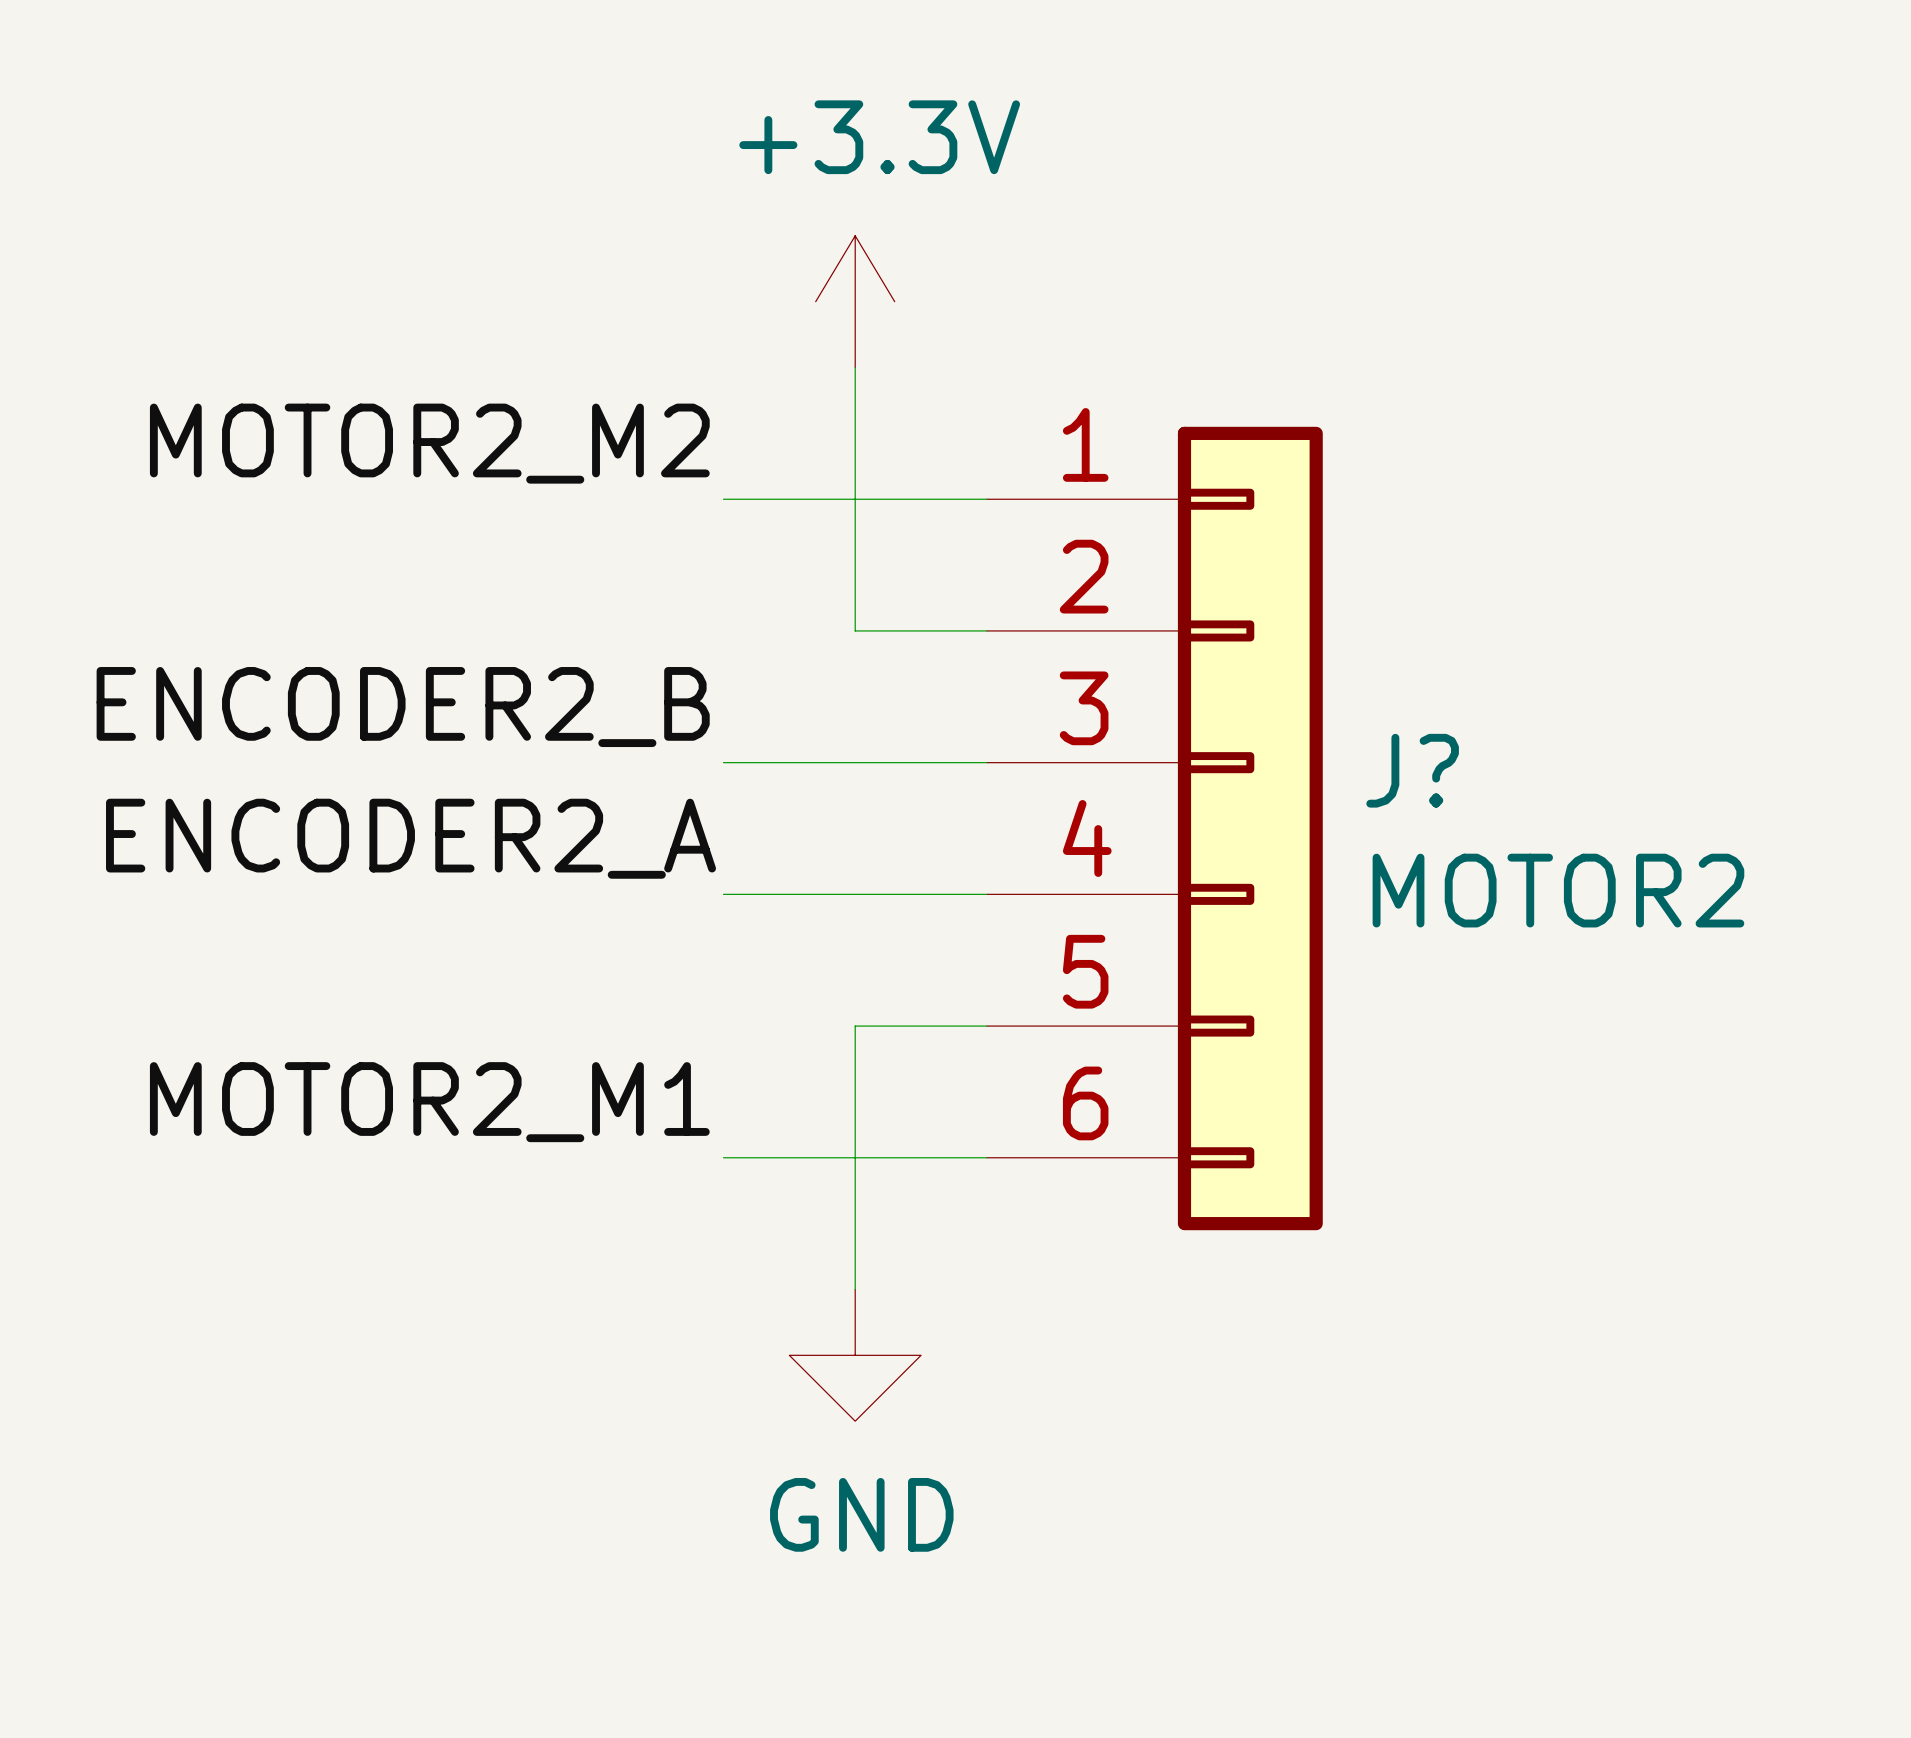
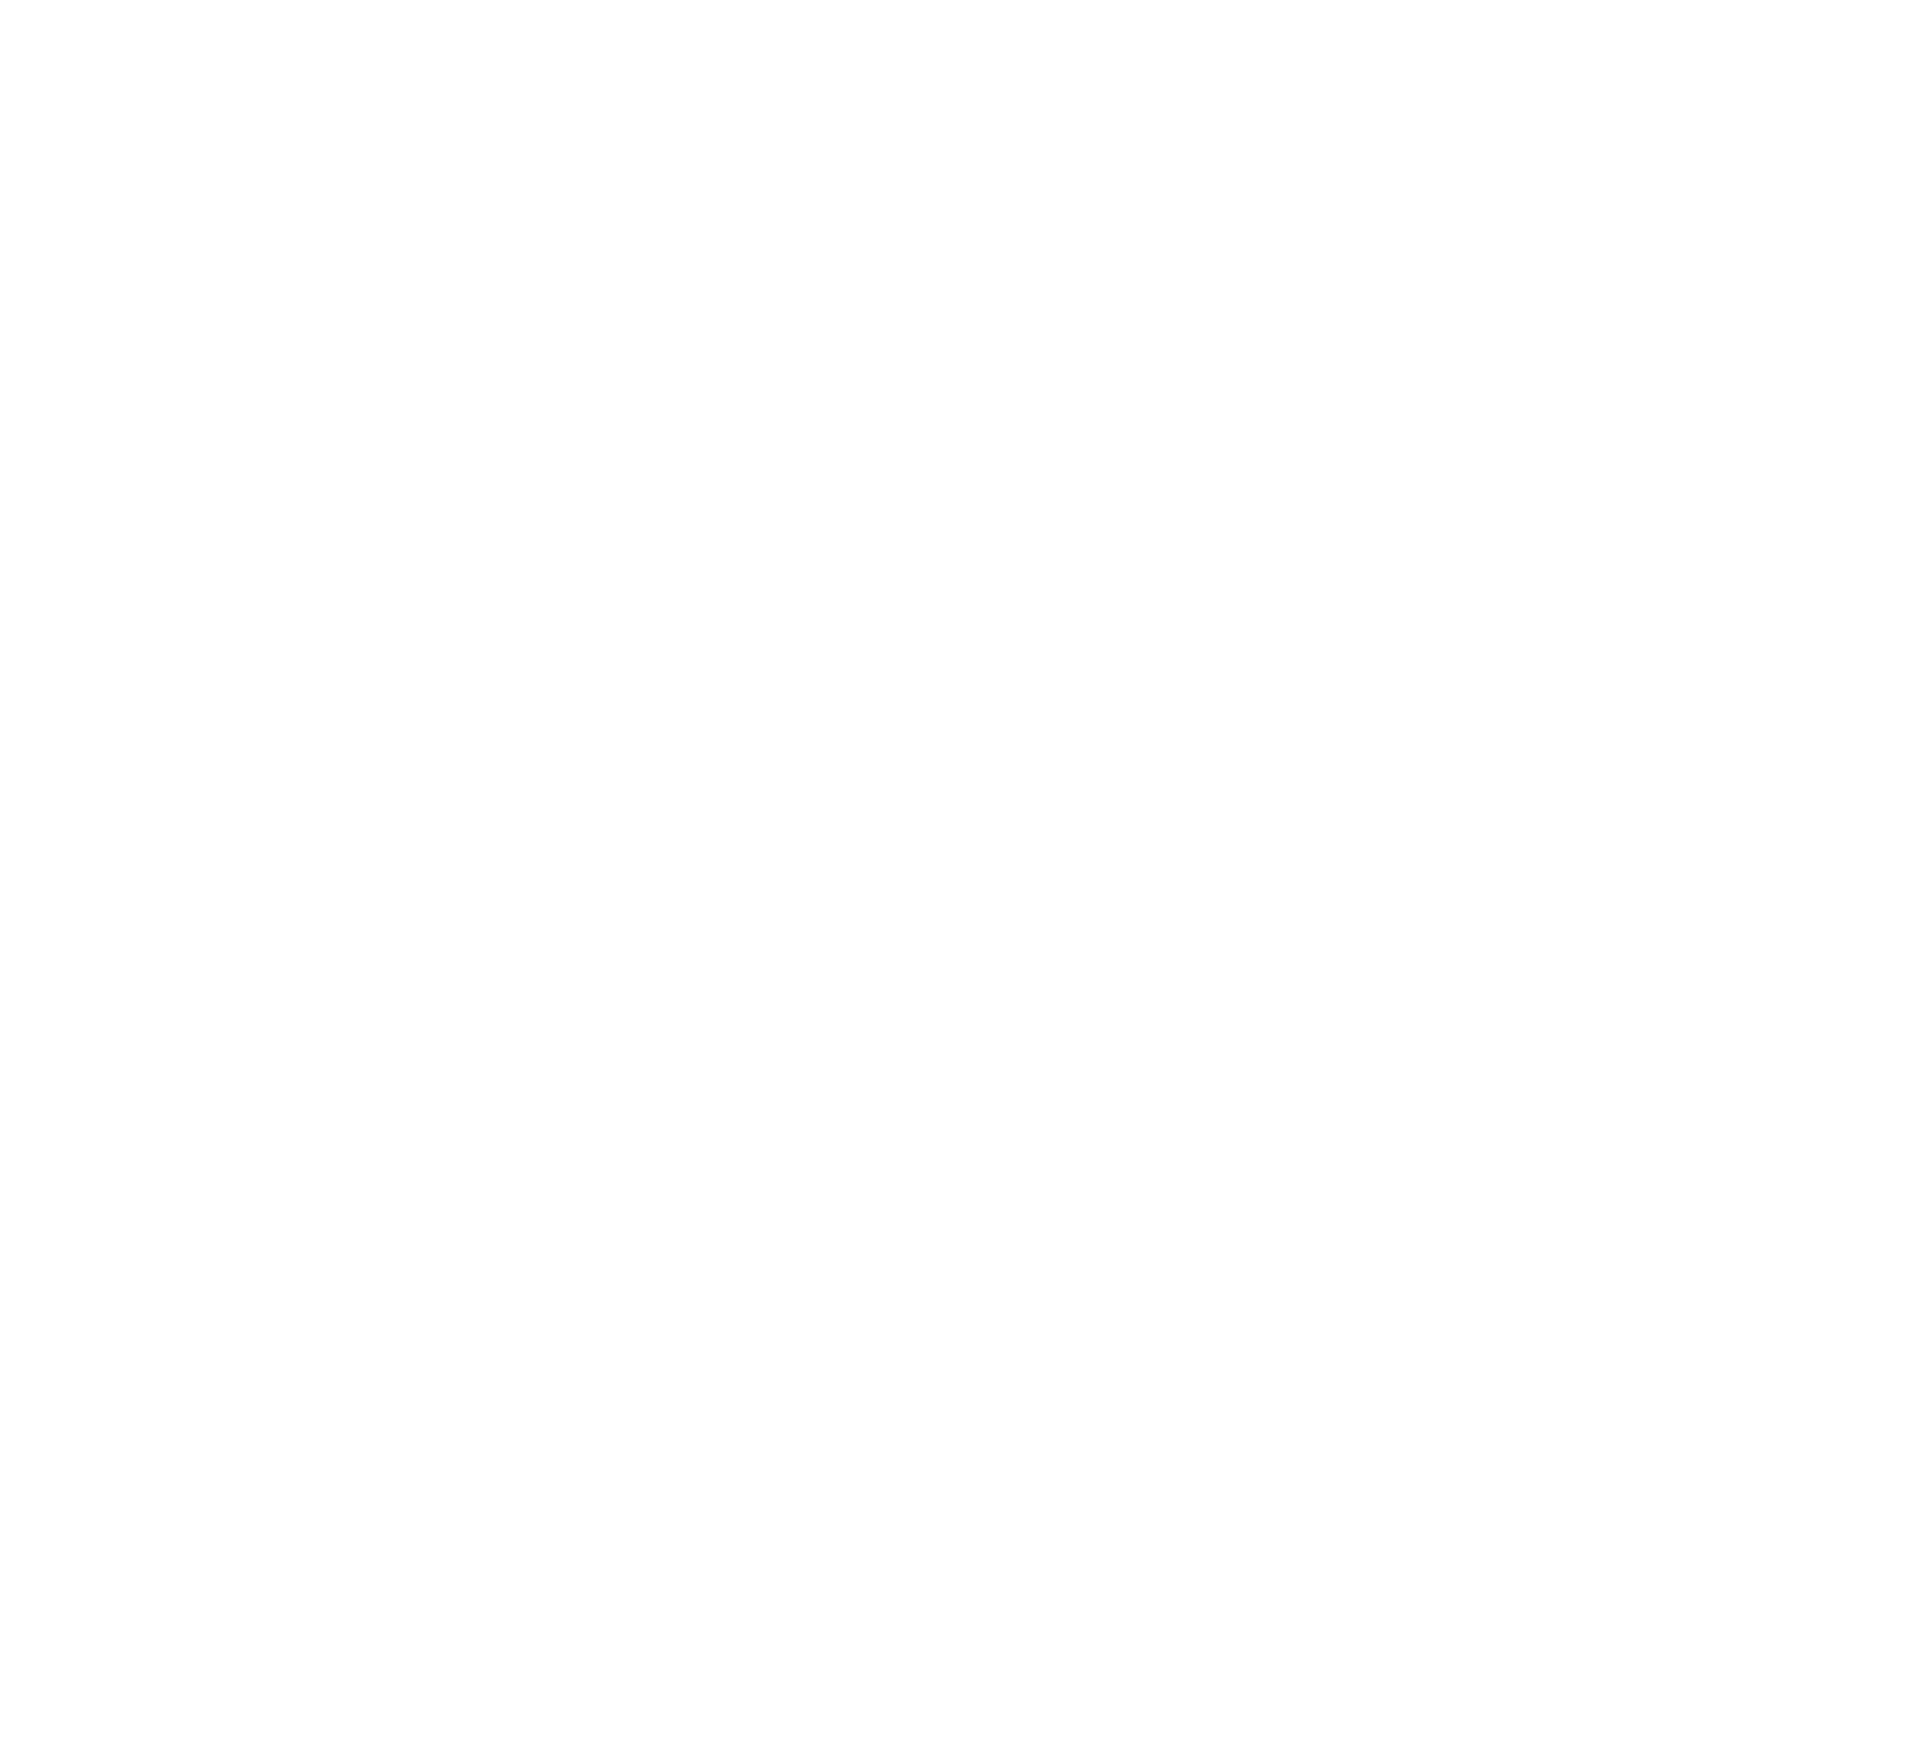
power symbol: +3.3V (855, 301) -> none
wire: (855, 367) (855, 630) (986, 630) -> none
label: MOTOR2_M2 (429, 443) -> none
wire: (723, 499) (986, 499) -> none
label: ENCODER2_B (403, 707) -> none
wire: (723, 762) (986, 762) -> none
J?: MOTOR2 (1154, 828) -> none
label: ENCODER2_A (411, 838) -> none
wire: (723, 894) (986, 894) -> none
wire: (986, 1026) (855, 1026) (855, 1289) -> none
label: MOTOR2_M1 (429, 1102) -> none
wire: (723, 1157) (986, 1157) -> none
power symbol: GND (855, 1355) -> none

